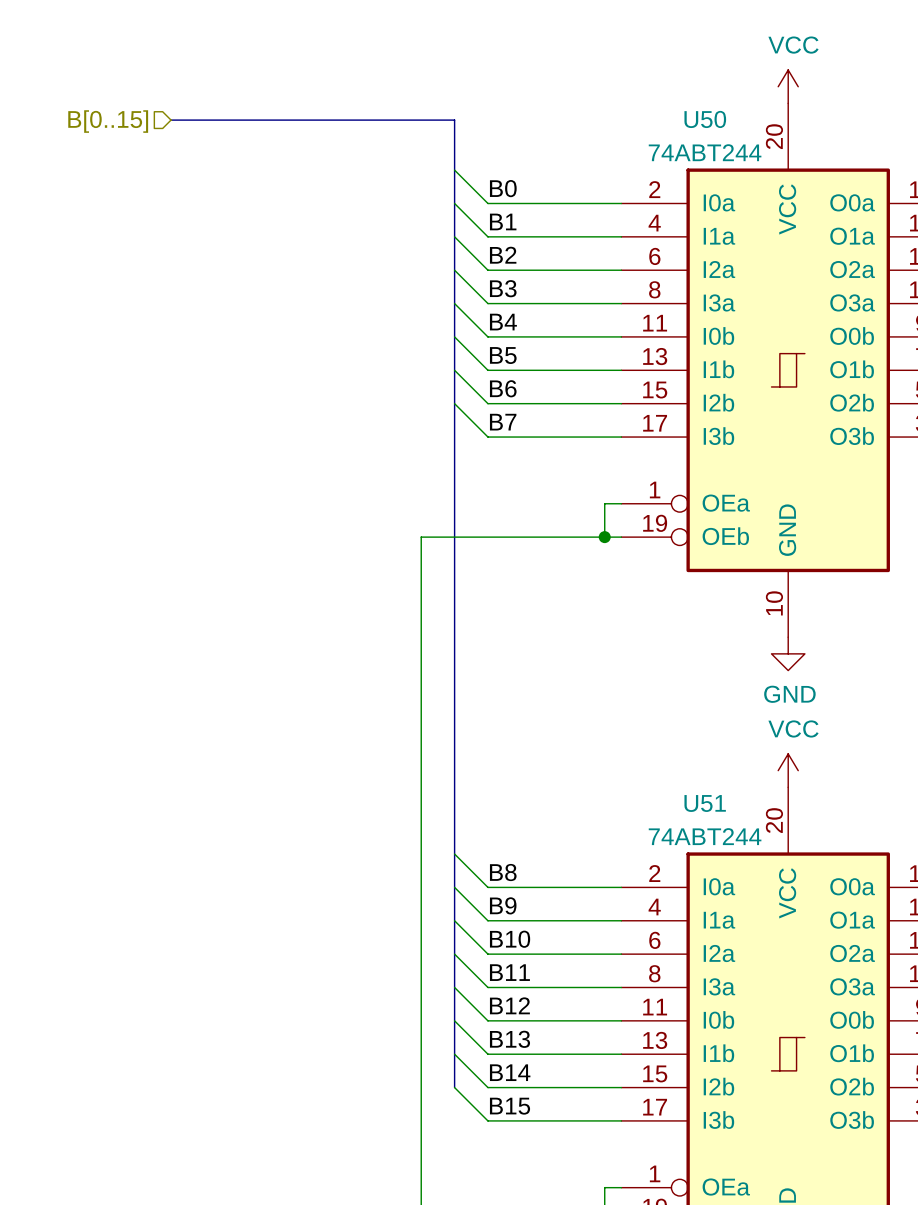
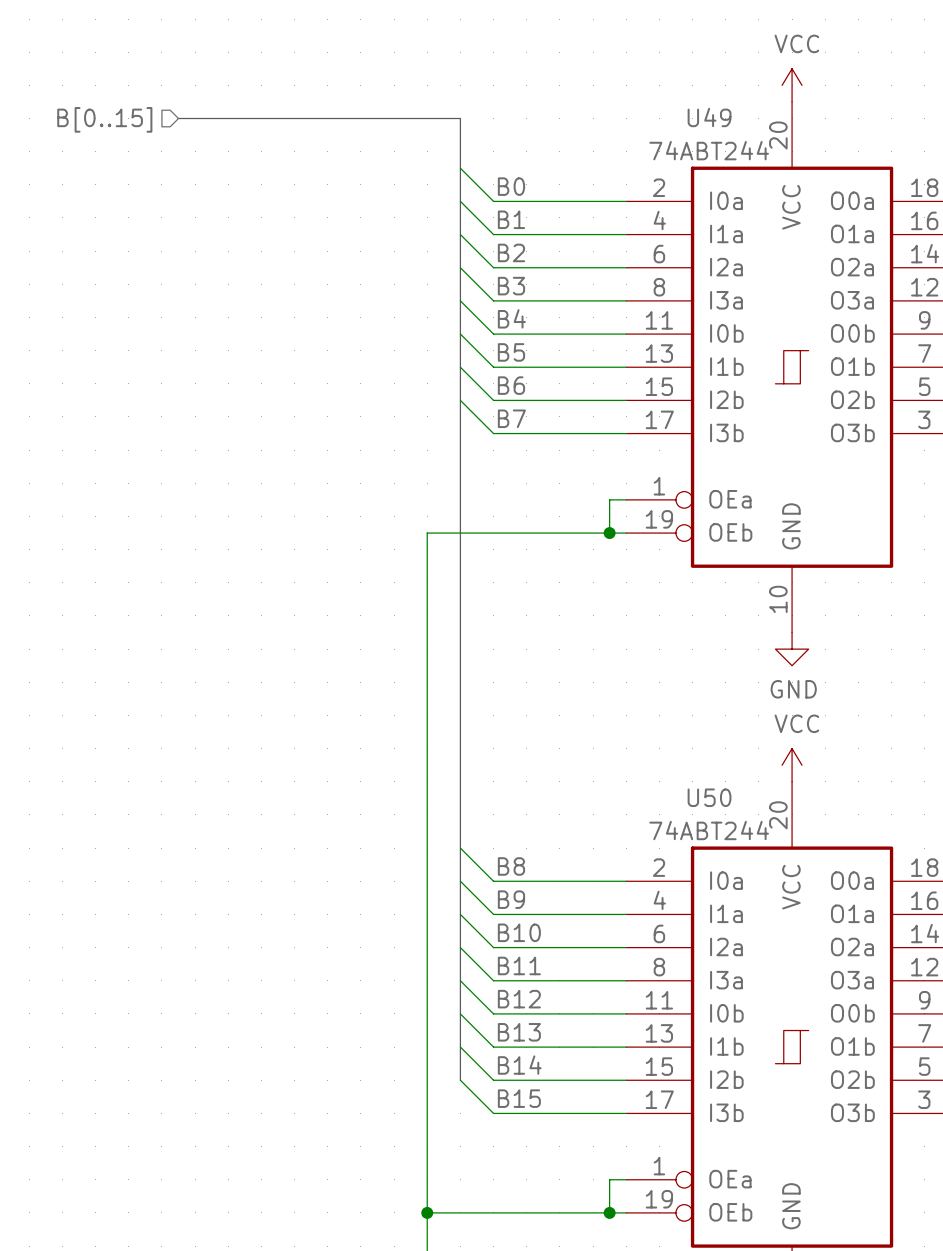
U50 name: U50 (705, 119) -> U49 (709, 117)
U51 name: U51 (705, 803) -> U50 (709, 797)

